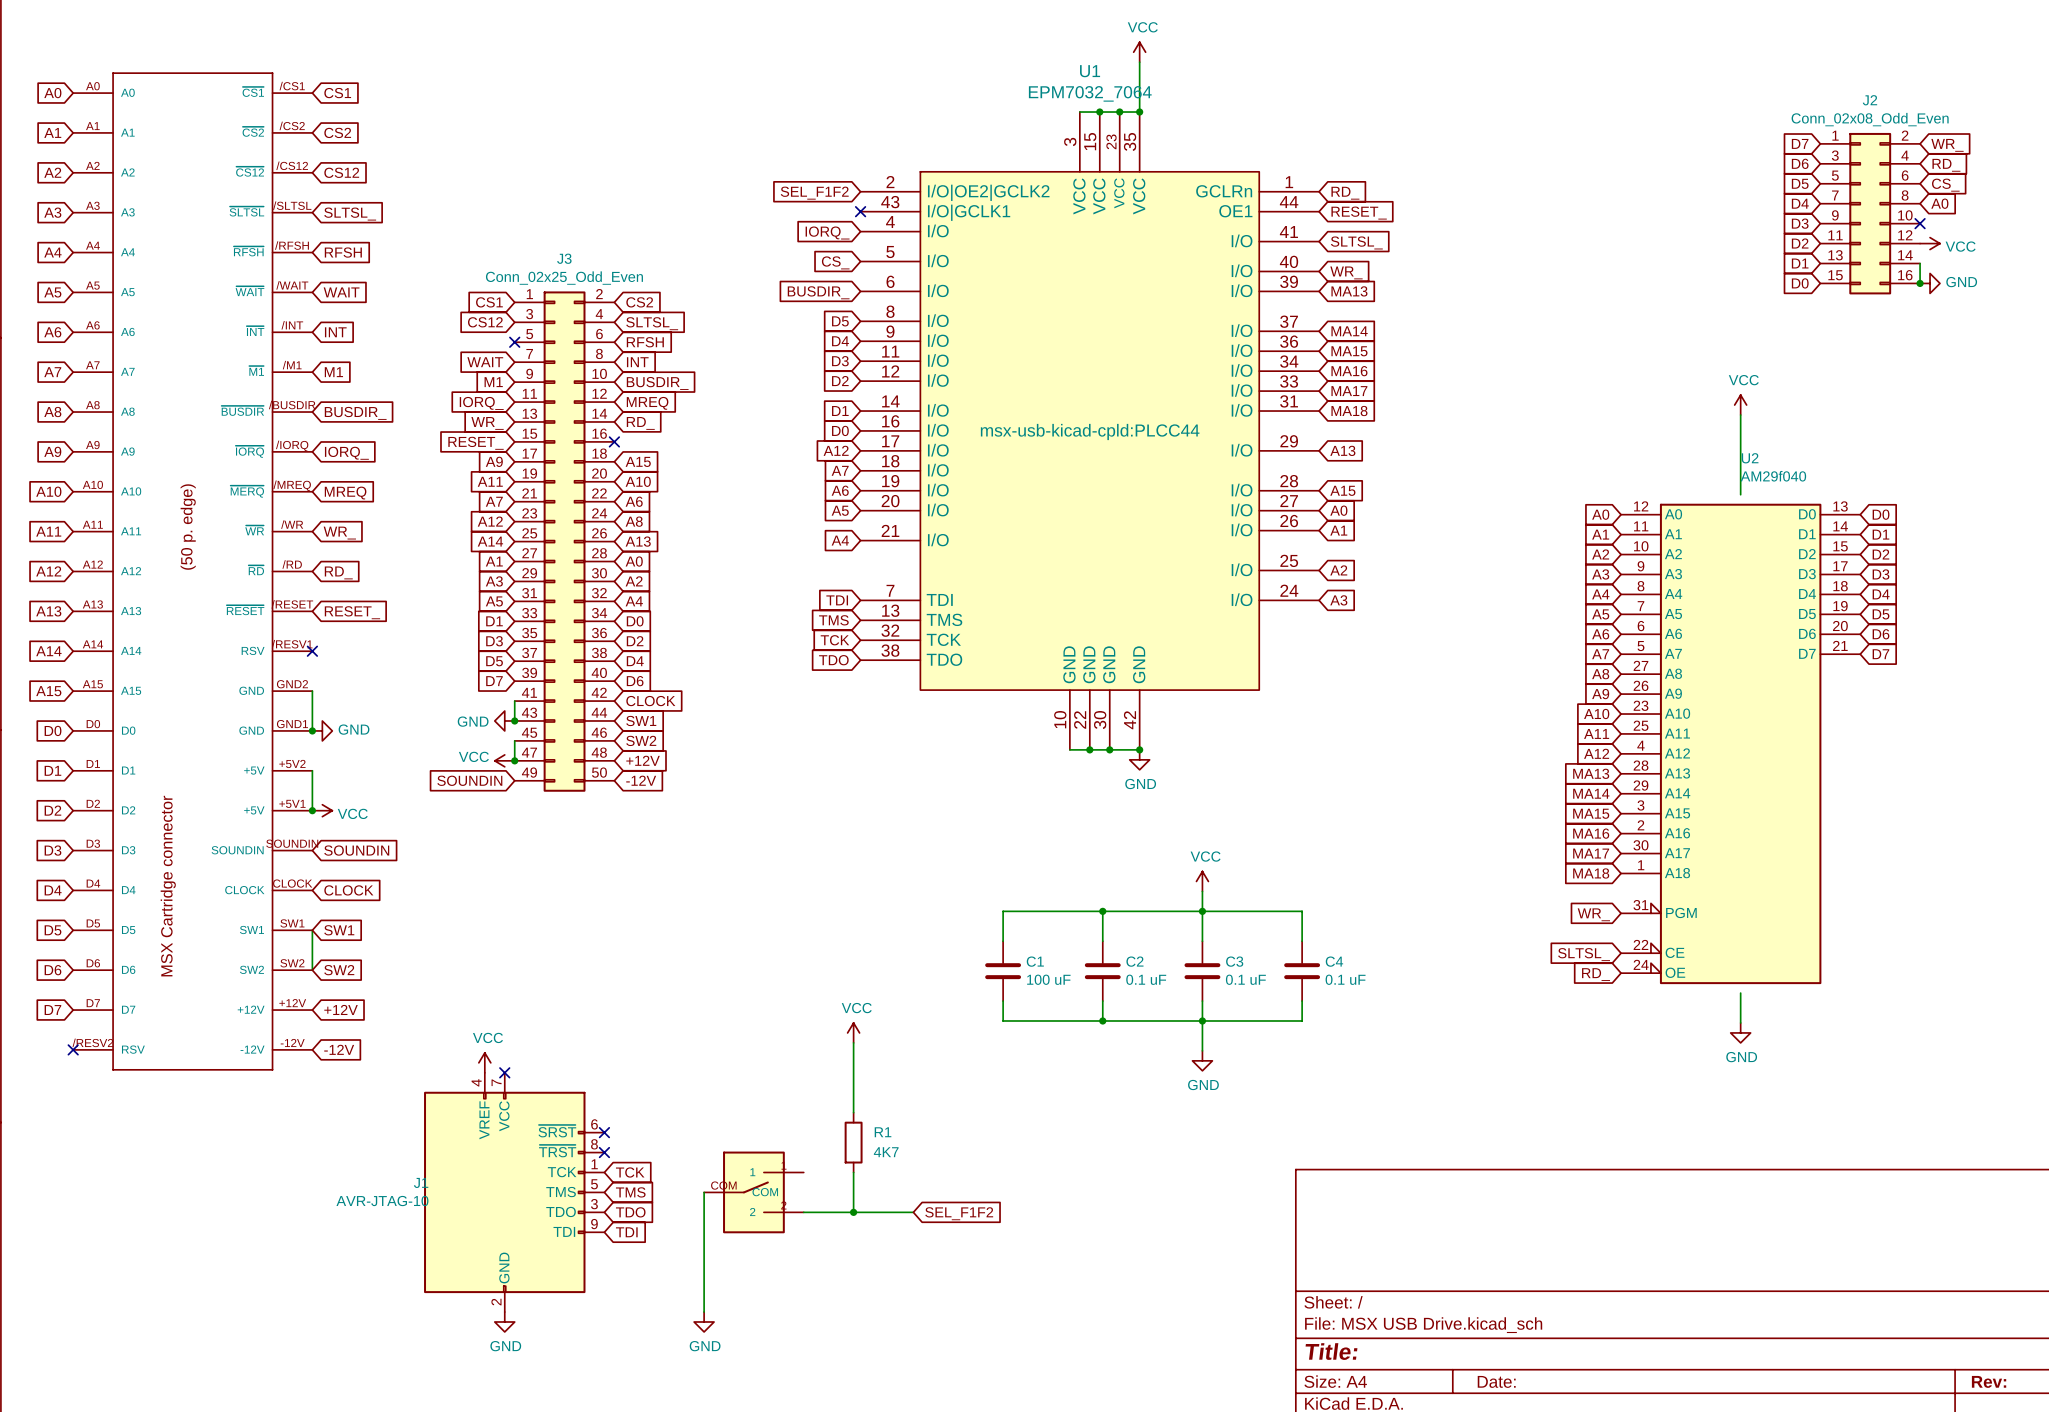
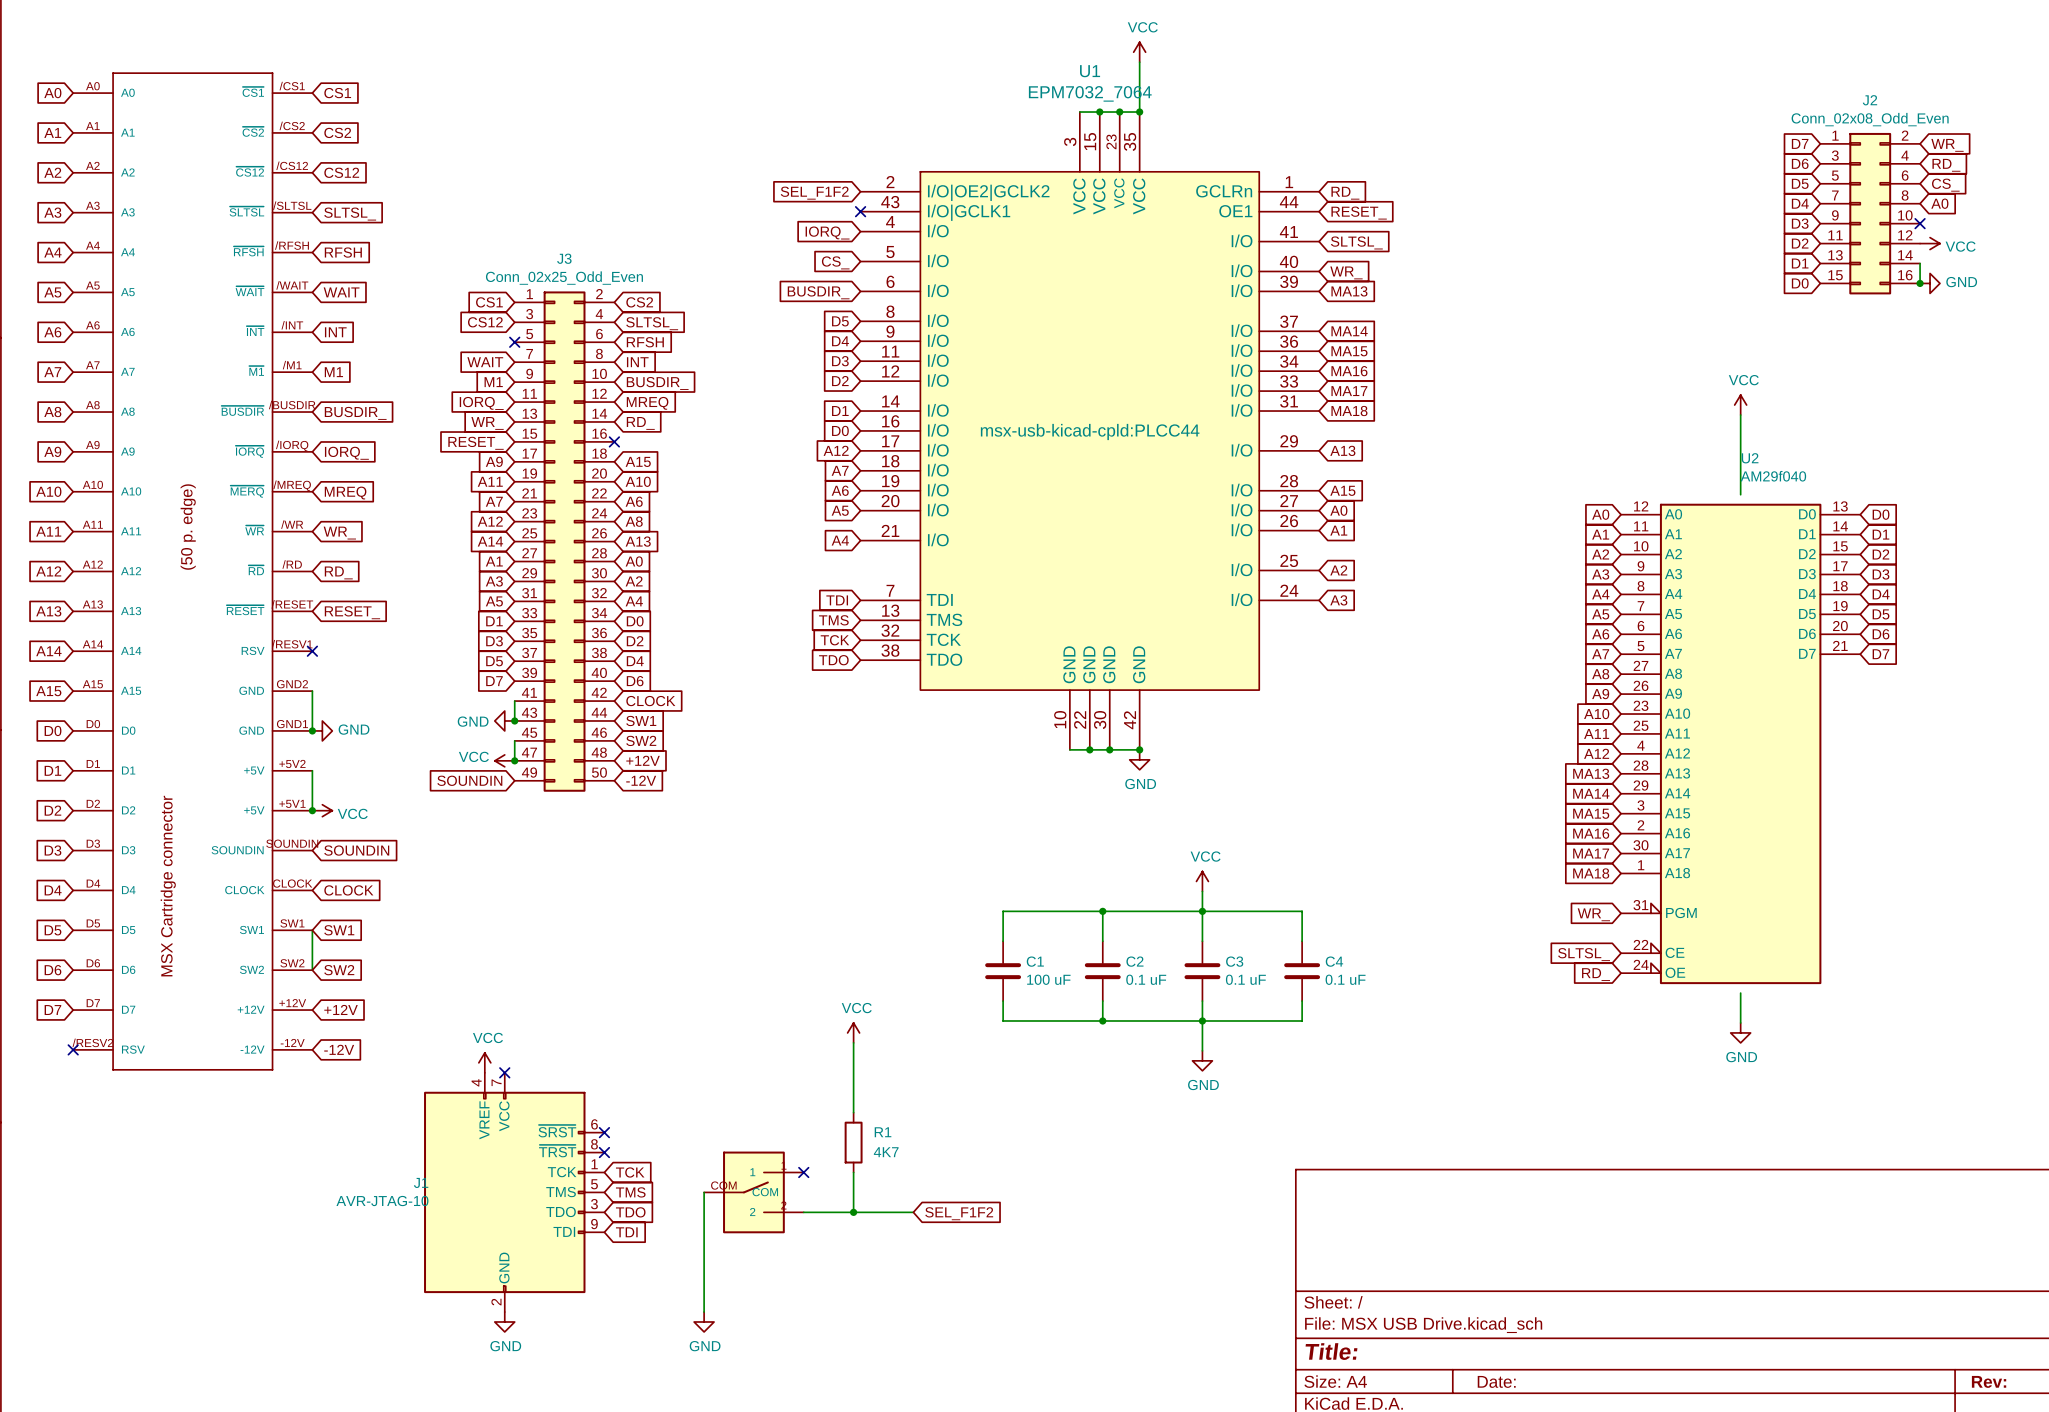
no-connect mark: none -> (803, 1172)

